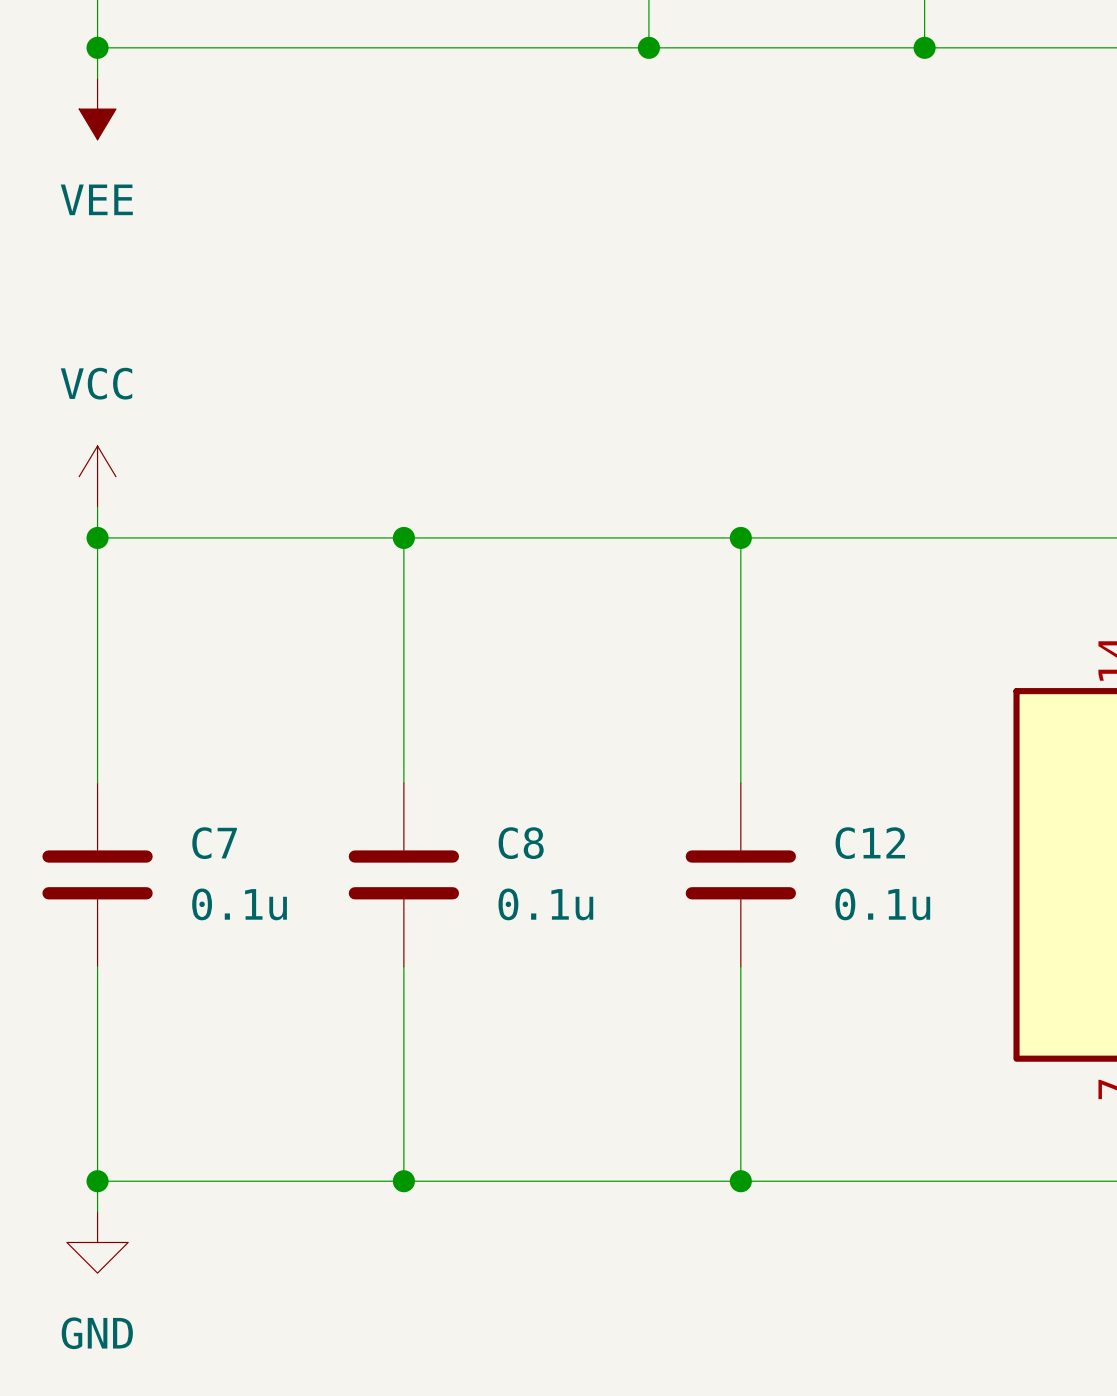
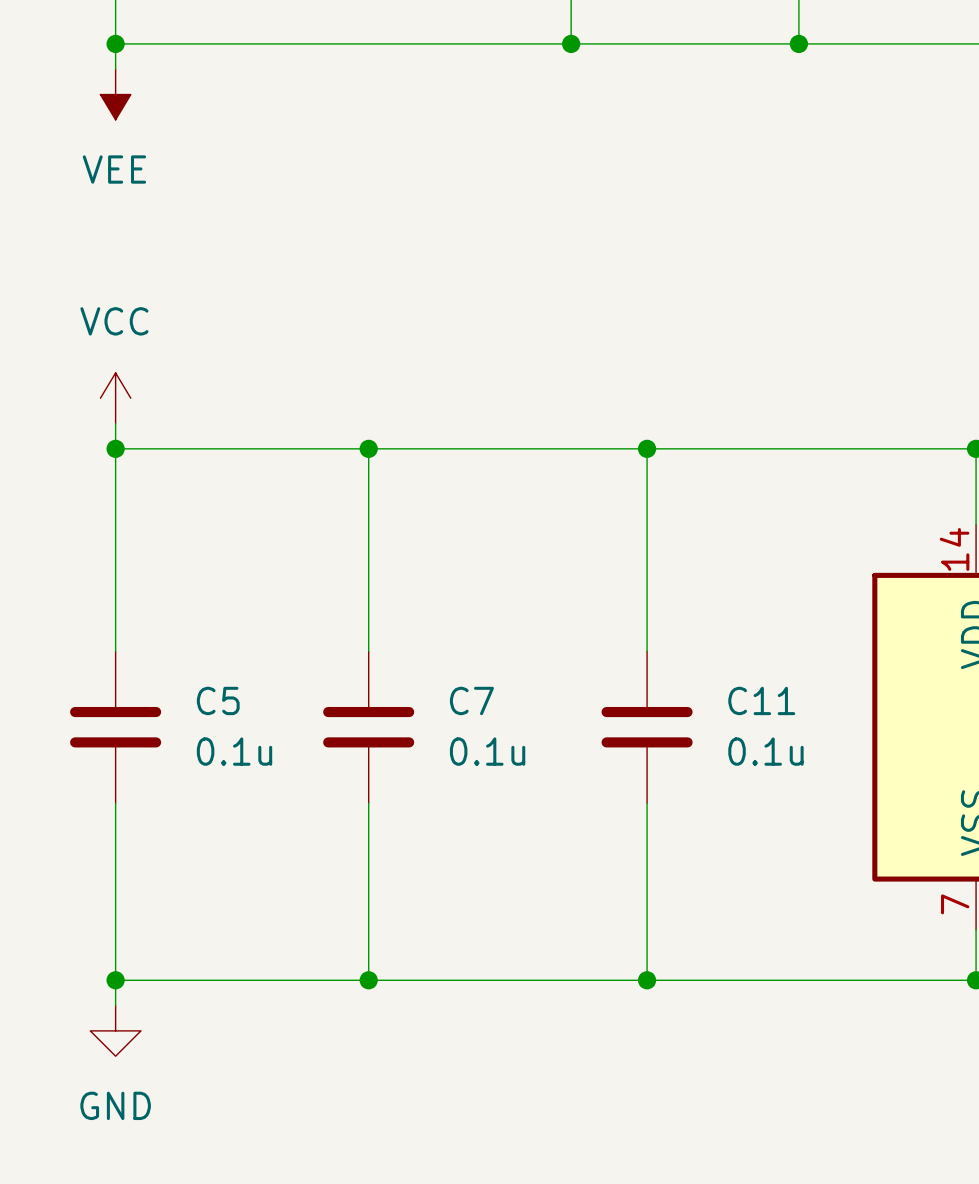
C7 name: C7 (214, 843) -> C5 (218, 700)
C8 name: C8 (521, 843) -> C7 (471, 700)
C12 name: C12 (870, 843) -> C11 (761, 700)

